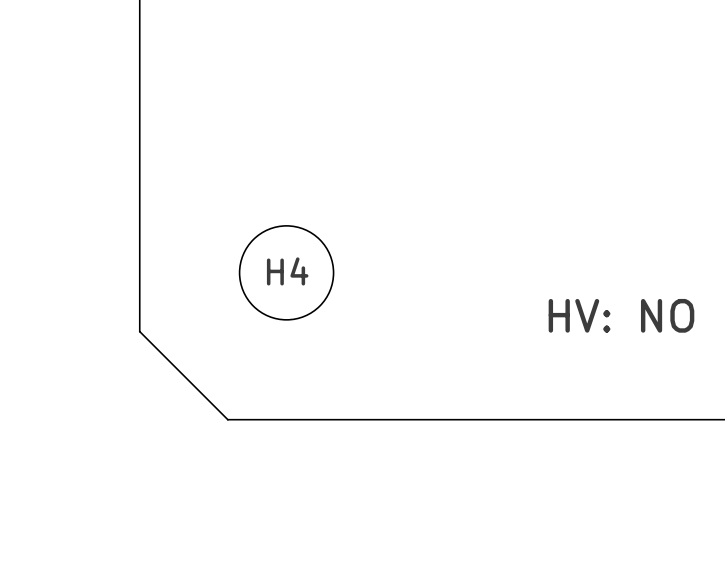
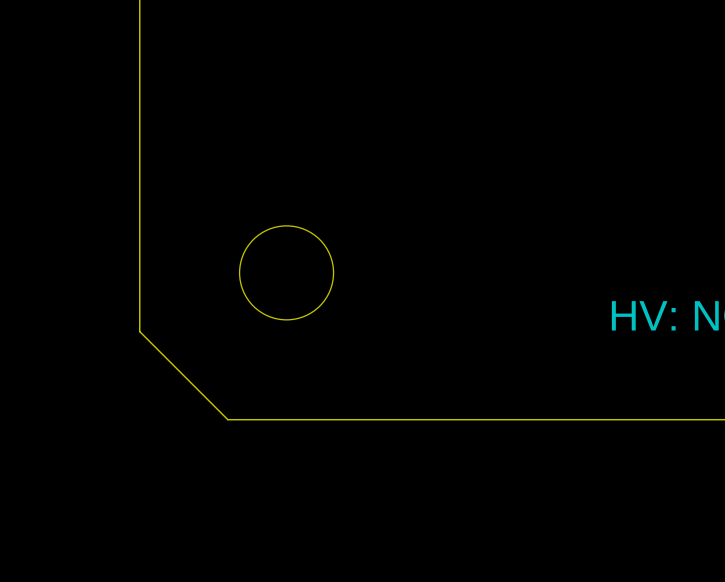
H4 name: H4 (287, 271) -> none

